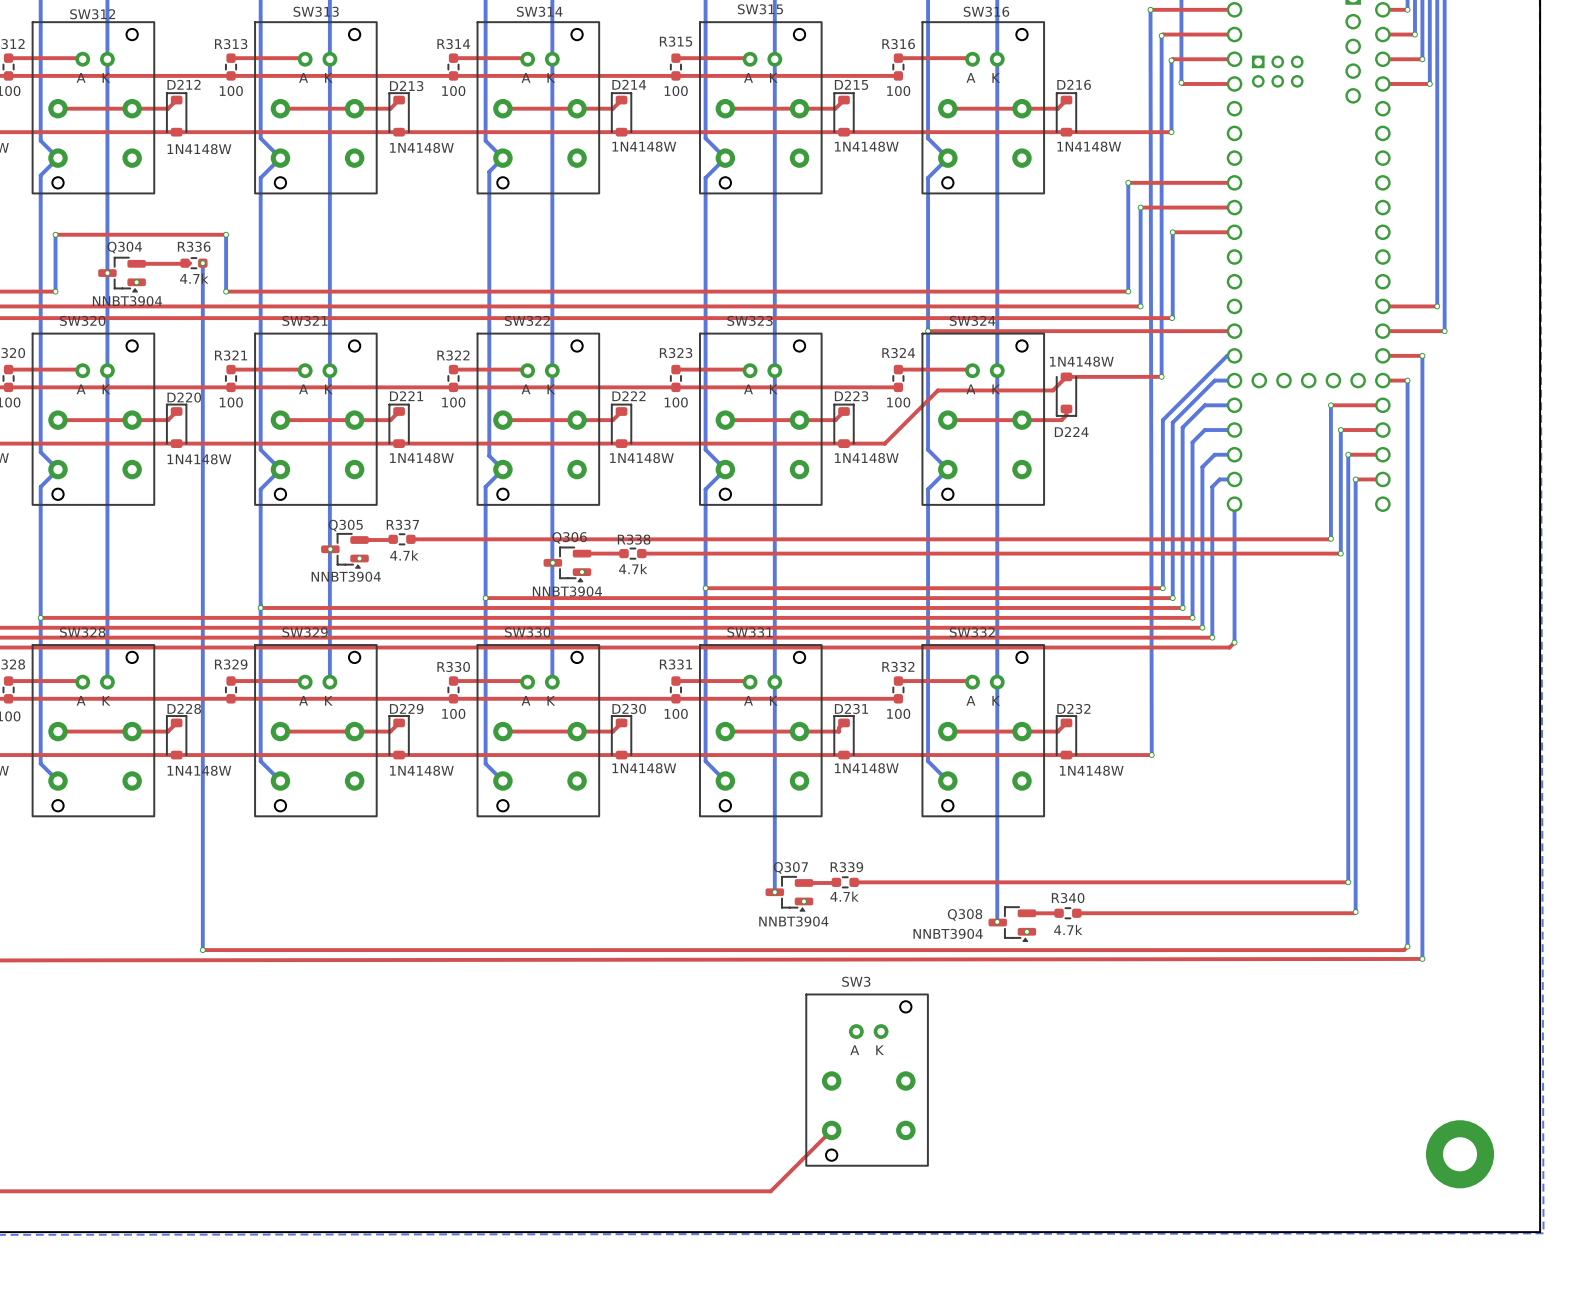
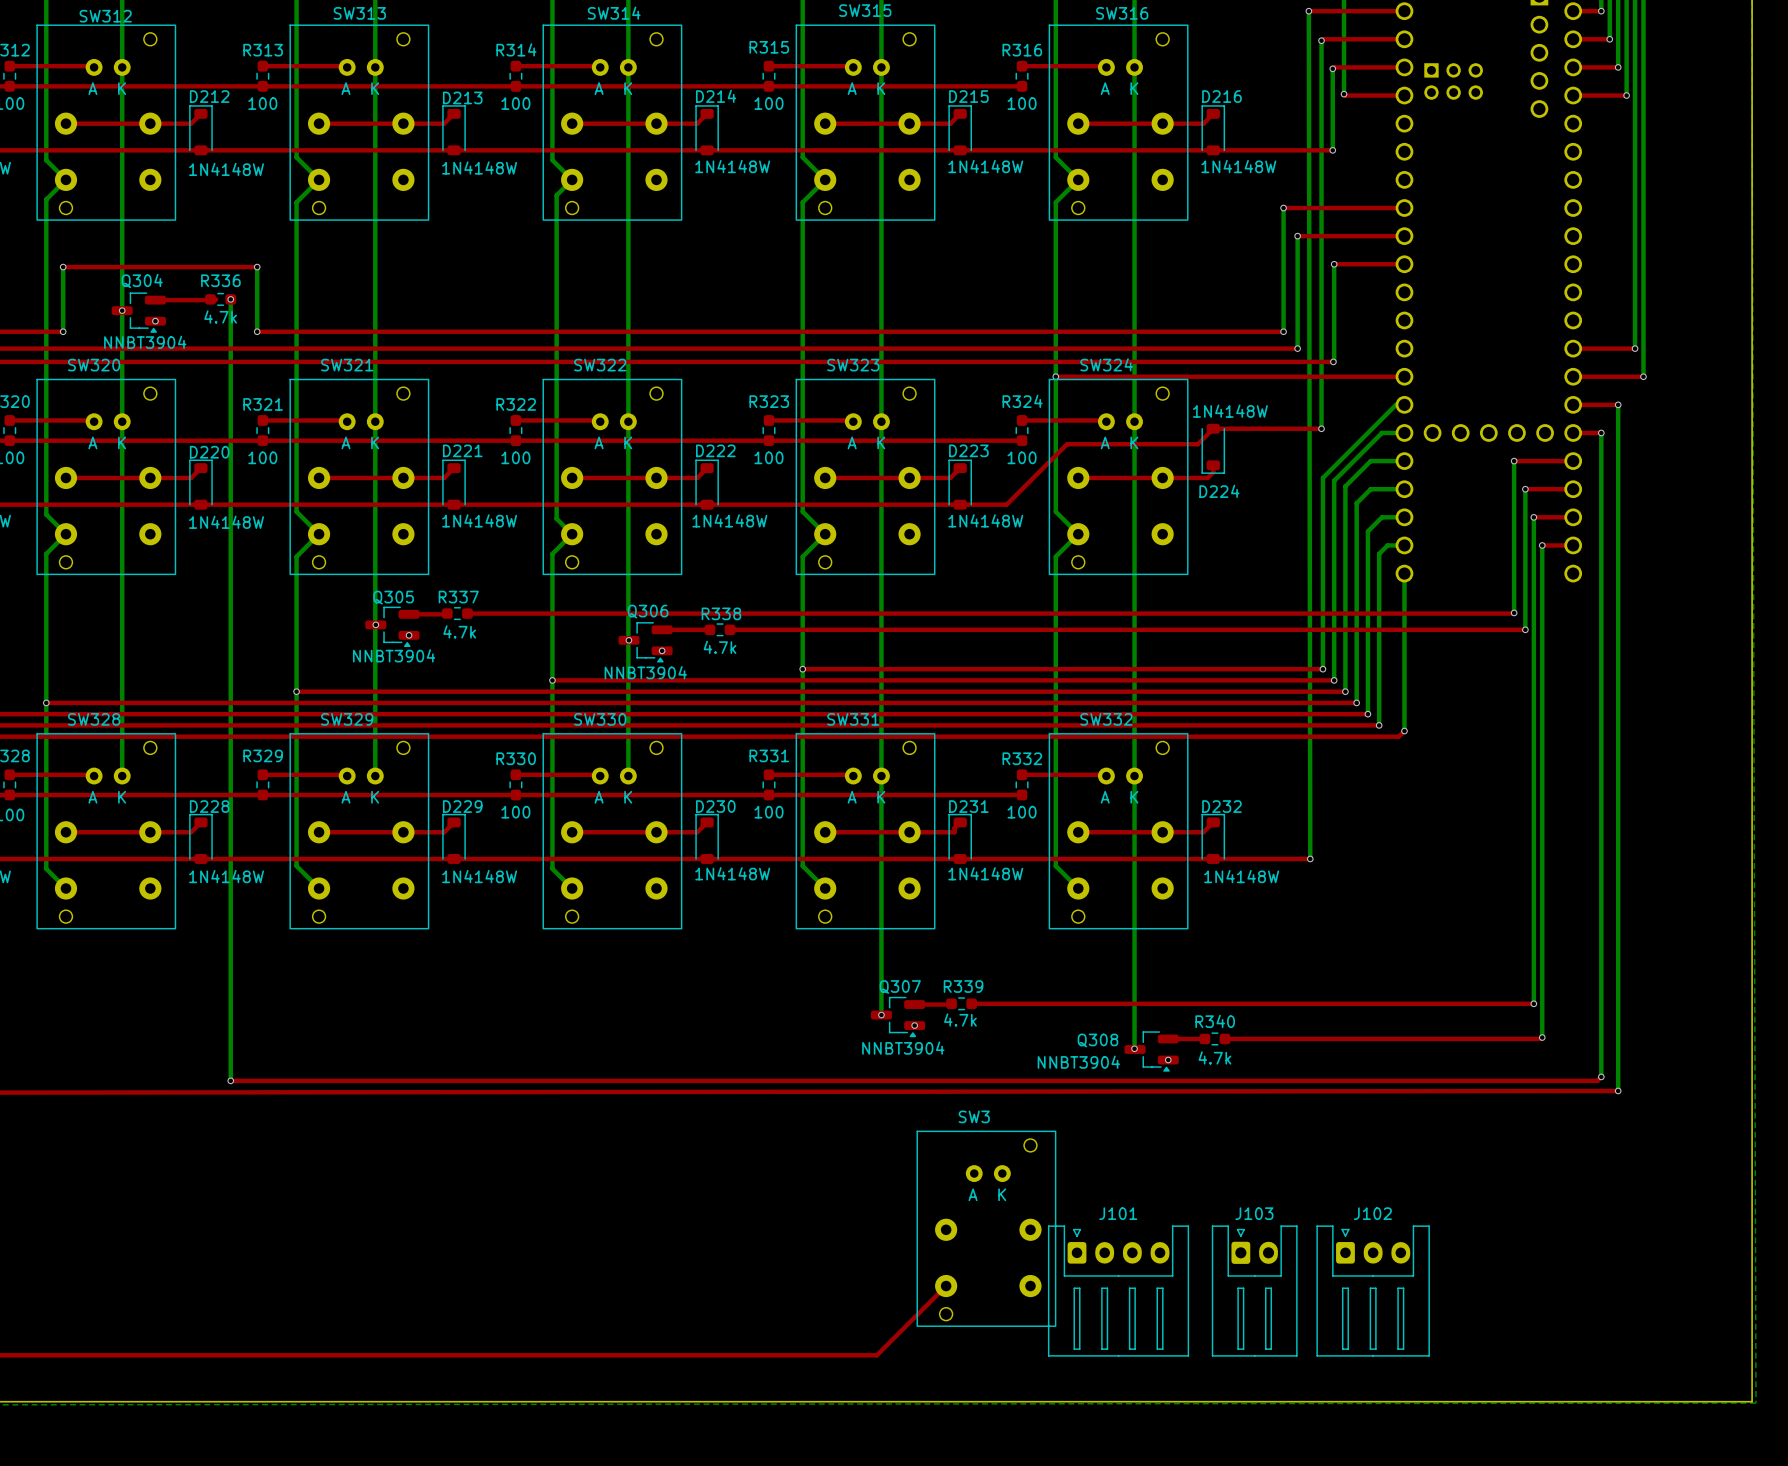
J101: none -> (1118, 1291)
J103: none -> (1254, 1291)
J102: none -> (1373, 1291)
part: (1460, 1154) -> none

